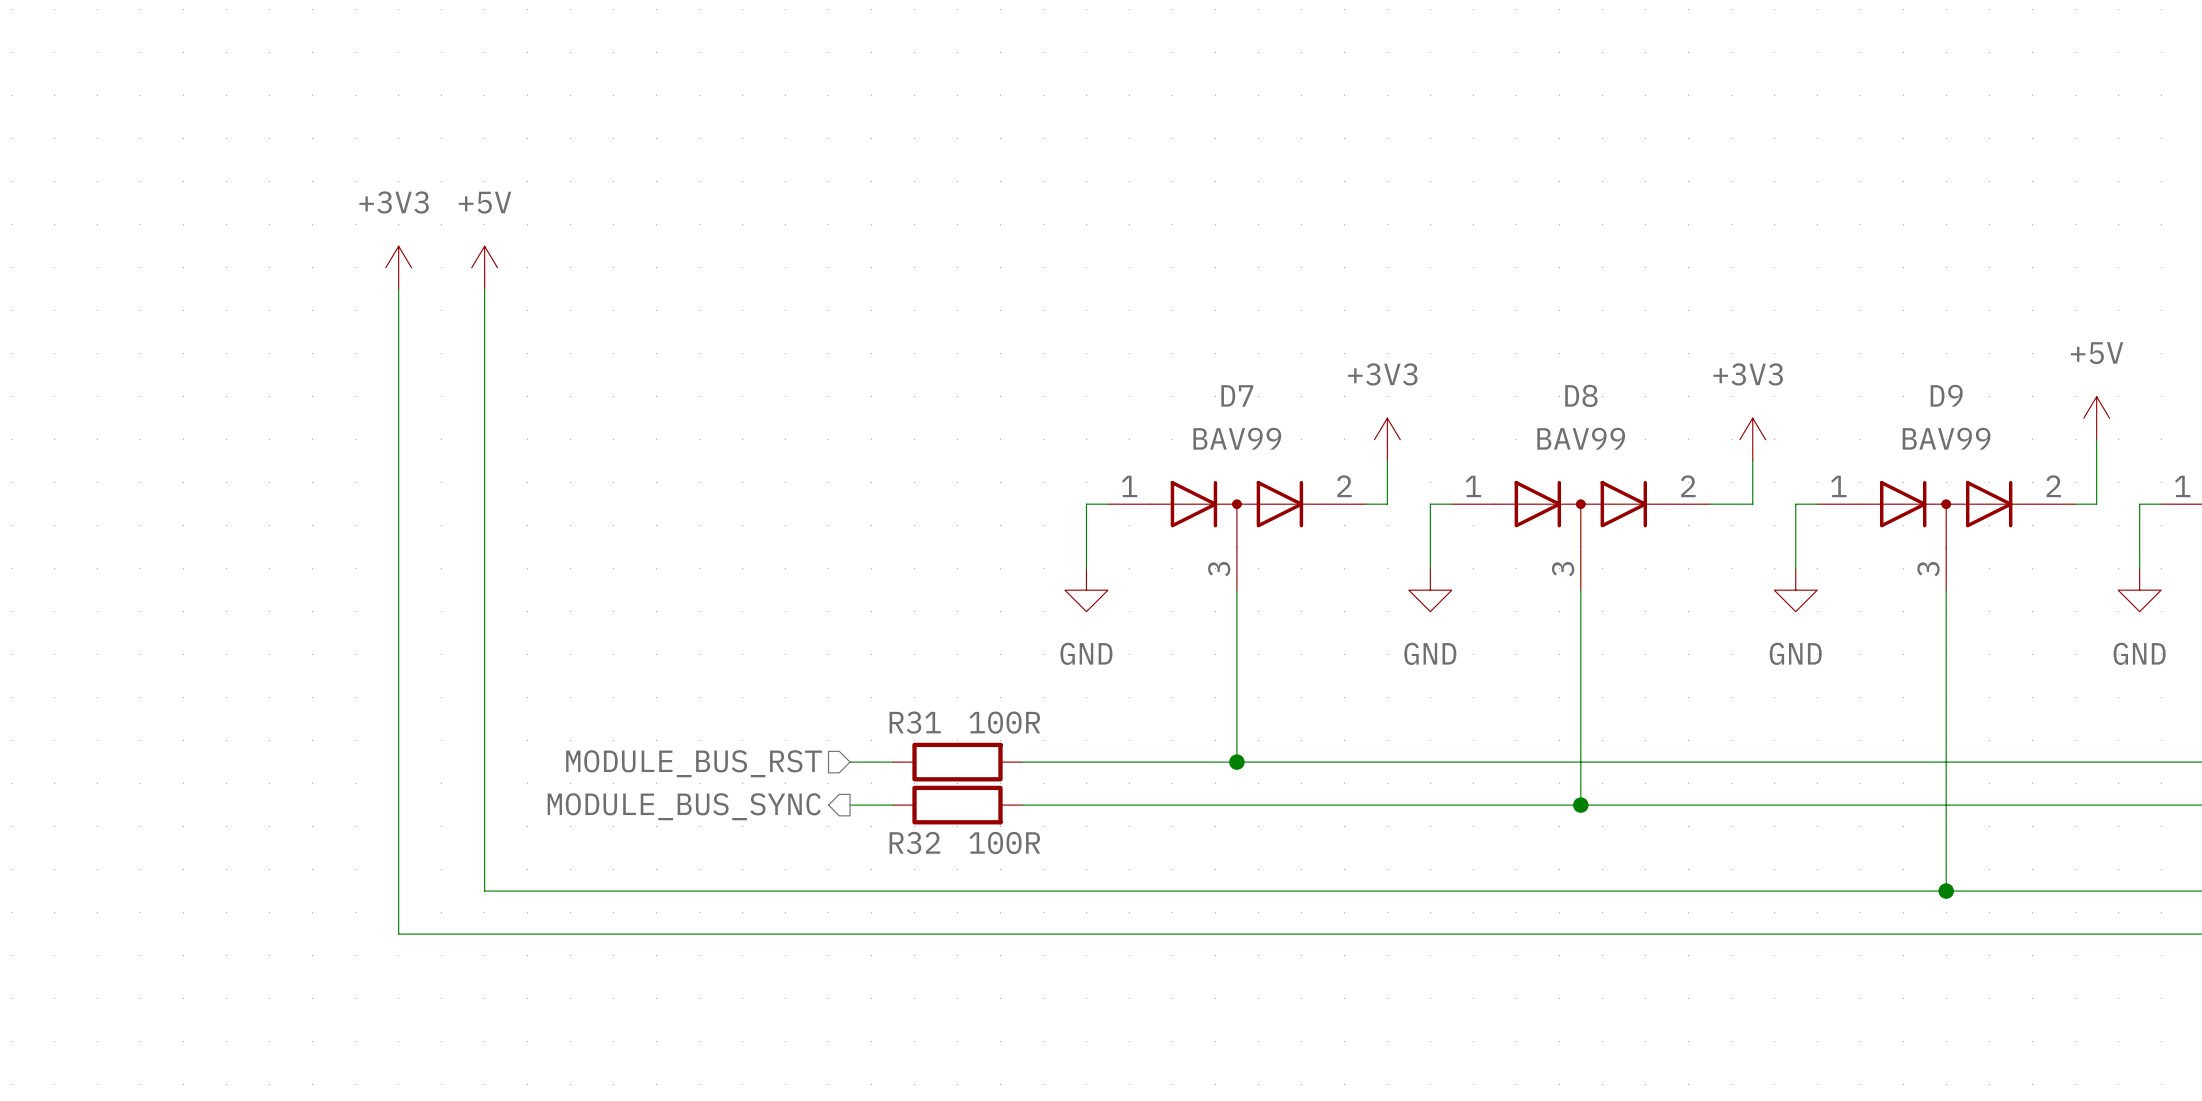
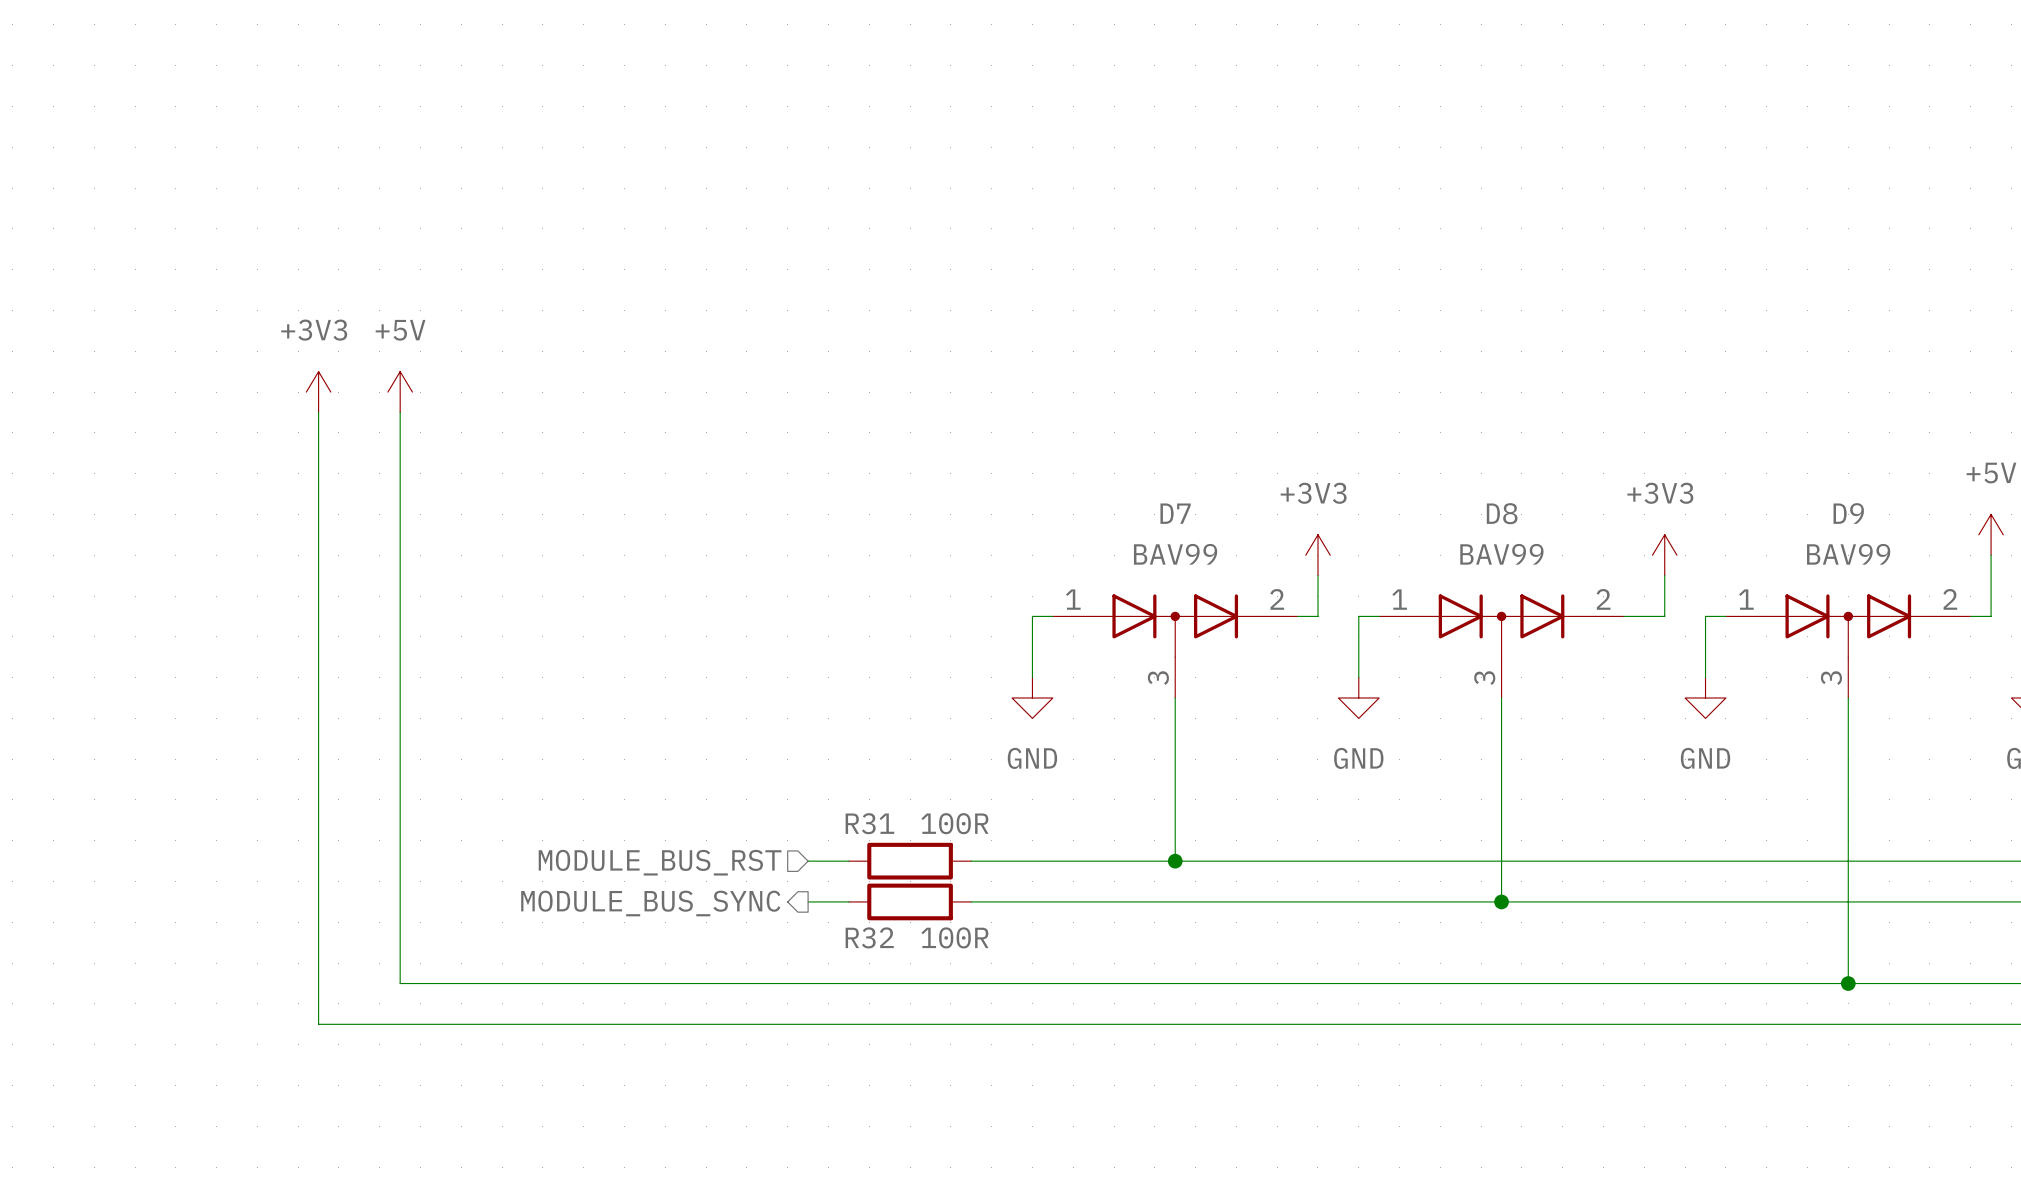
power symbol position: +3V3 (398, 267) -> +3V3 (318, 392)
power symbol position: +5V (484, 267) -> +5V (400, 392)
wire: (398, 289) (398, 934) -> (318, 412) (318, 1024) (379, 1024)
wire: (484, 289) (484, 891) -> (400, 412) (400, 983) (461, 983)

